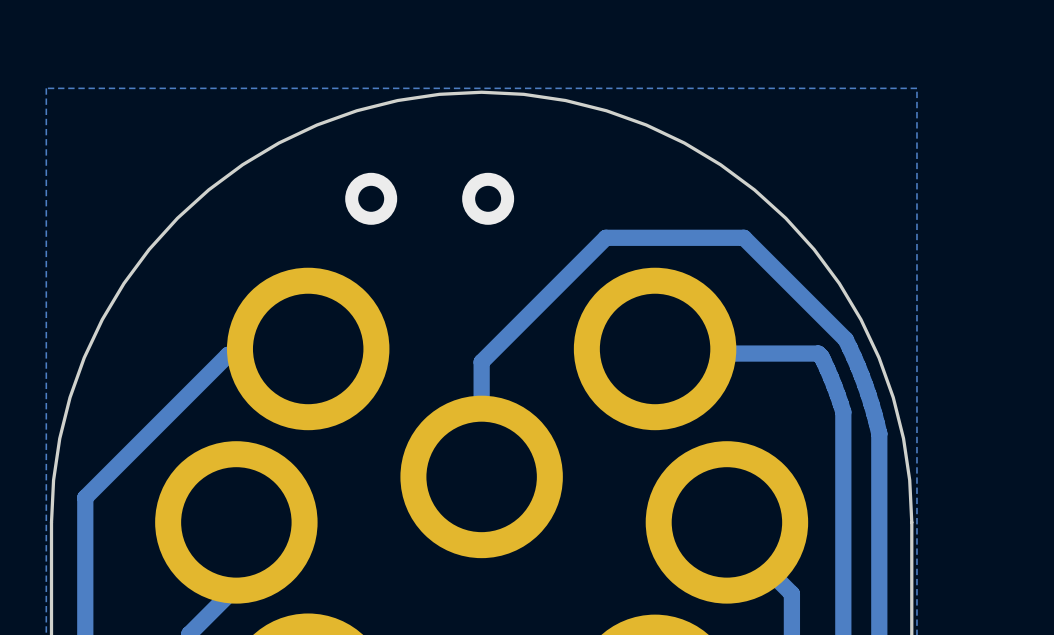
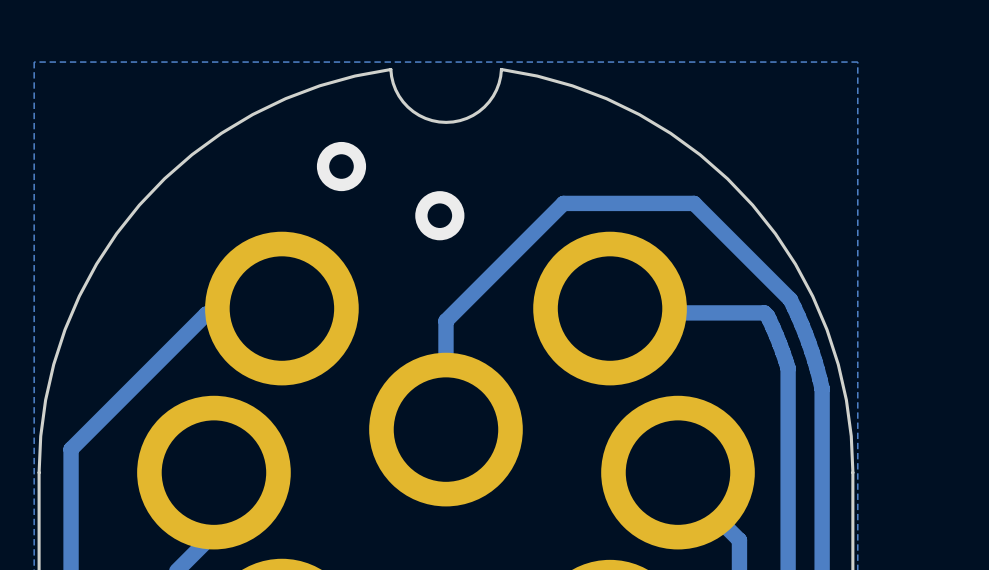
via position: (488, 198) -> (439, 215)
board edge: (911, 522) (909, 480) (903, 438) (893, 397) (879, 357) (860, 319) (839, 283) (814, 249) (785, 218) (754, 189) (720, 164) (684, 143) (646, 125) (606, 110) (565, 100) (523, 94) (481, 92) (439, 94) (397, 100) (356, 110) (317, 125) (278, 143) (242, 164) (208, 189) (177, 218) (149, 249) (123, 283) (102, 319) (84, 357) (70, 397) (59, 438) (53, 480) (51, 522) -> (852, 472) (851, 436) (846, 400) (838, 364) (827, 329) (812, 296) (795, 264) (775, 233) (752, 205) (727, 178) (700, 154) (670, 133) (639, 114) (606, 98) (572, 85) (537, 76) (501, 69) (496, 89) (489, 101) (479, 111) (460, 120) (439, 121) (425, 118) (413, 111) (403, 101) (395, 89) (390, 69) (354, 76) (319, 85) (285, 98) (252, 114) (221, 133) (192, 154) (164, 178) (139, 205) (116, 233) (96, 264) (79, 296) (64, 329) (53, 364) (45, 400) (40, 436) (39, 472)

